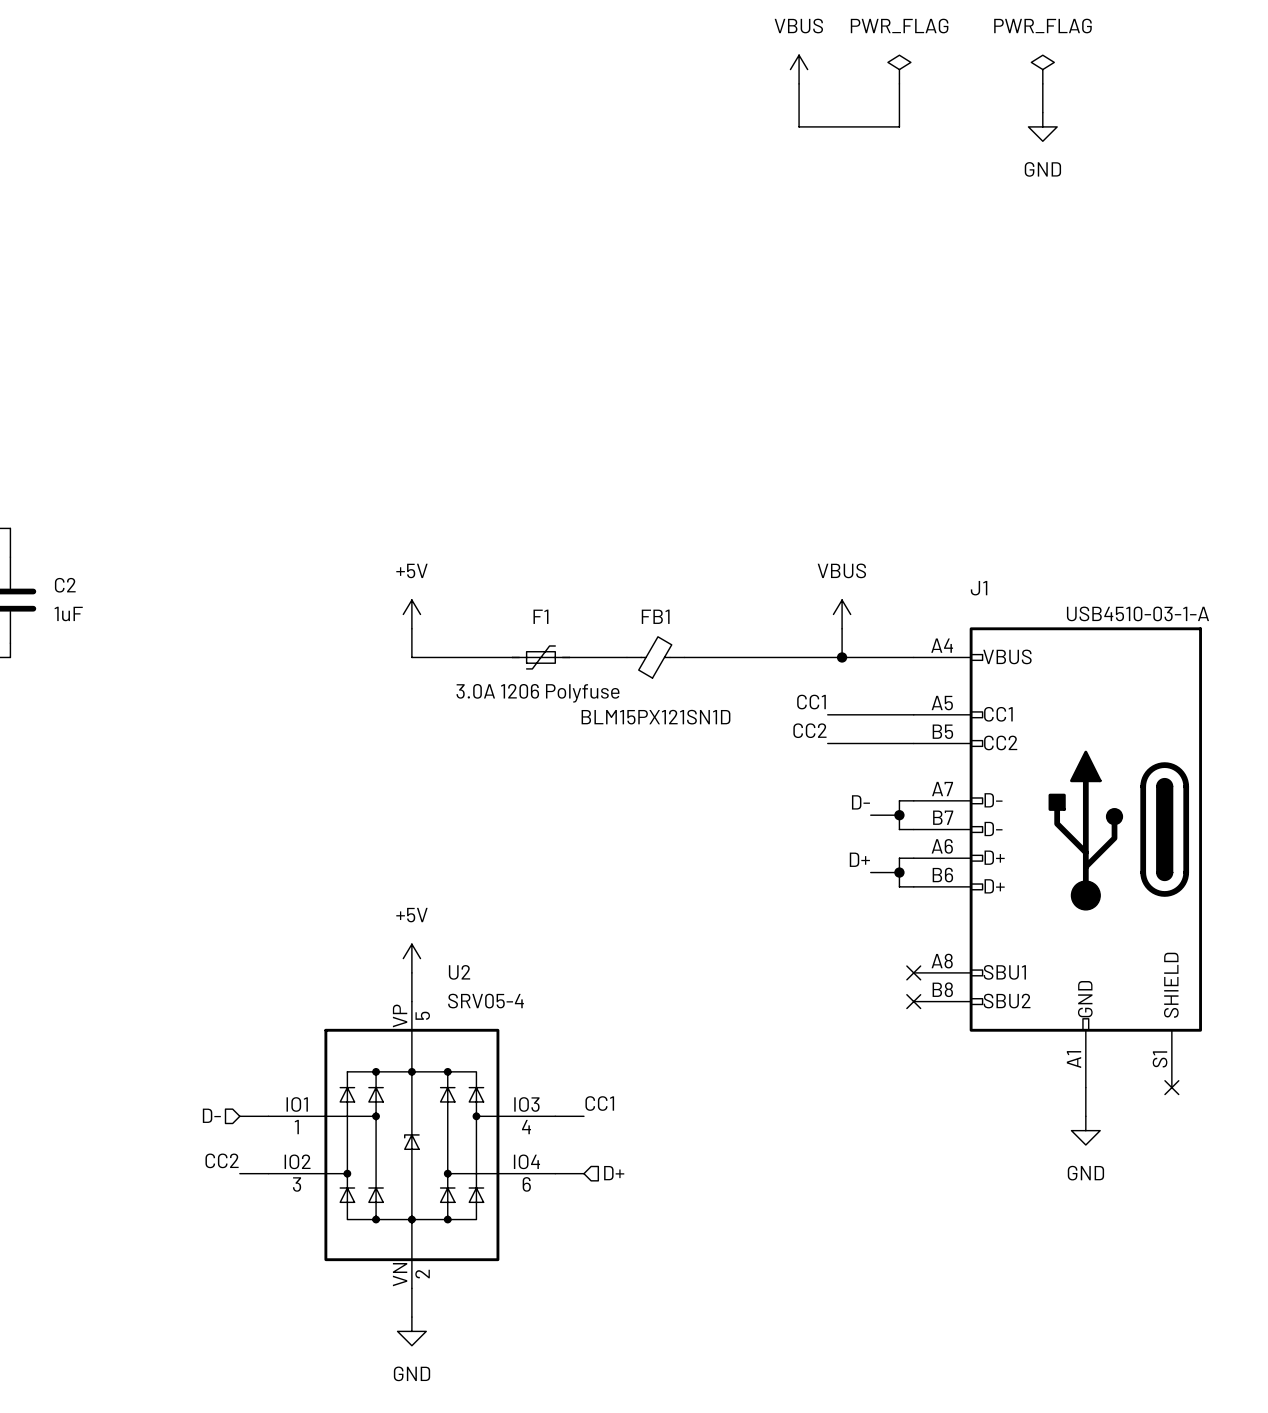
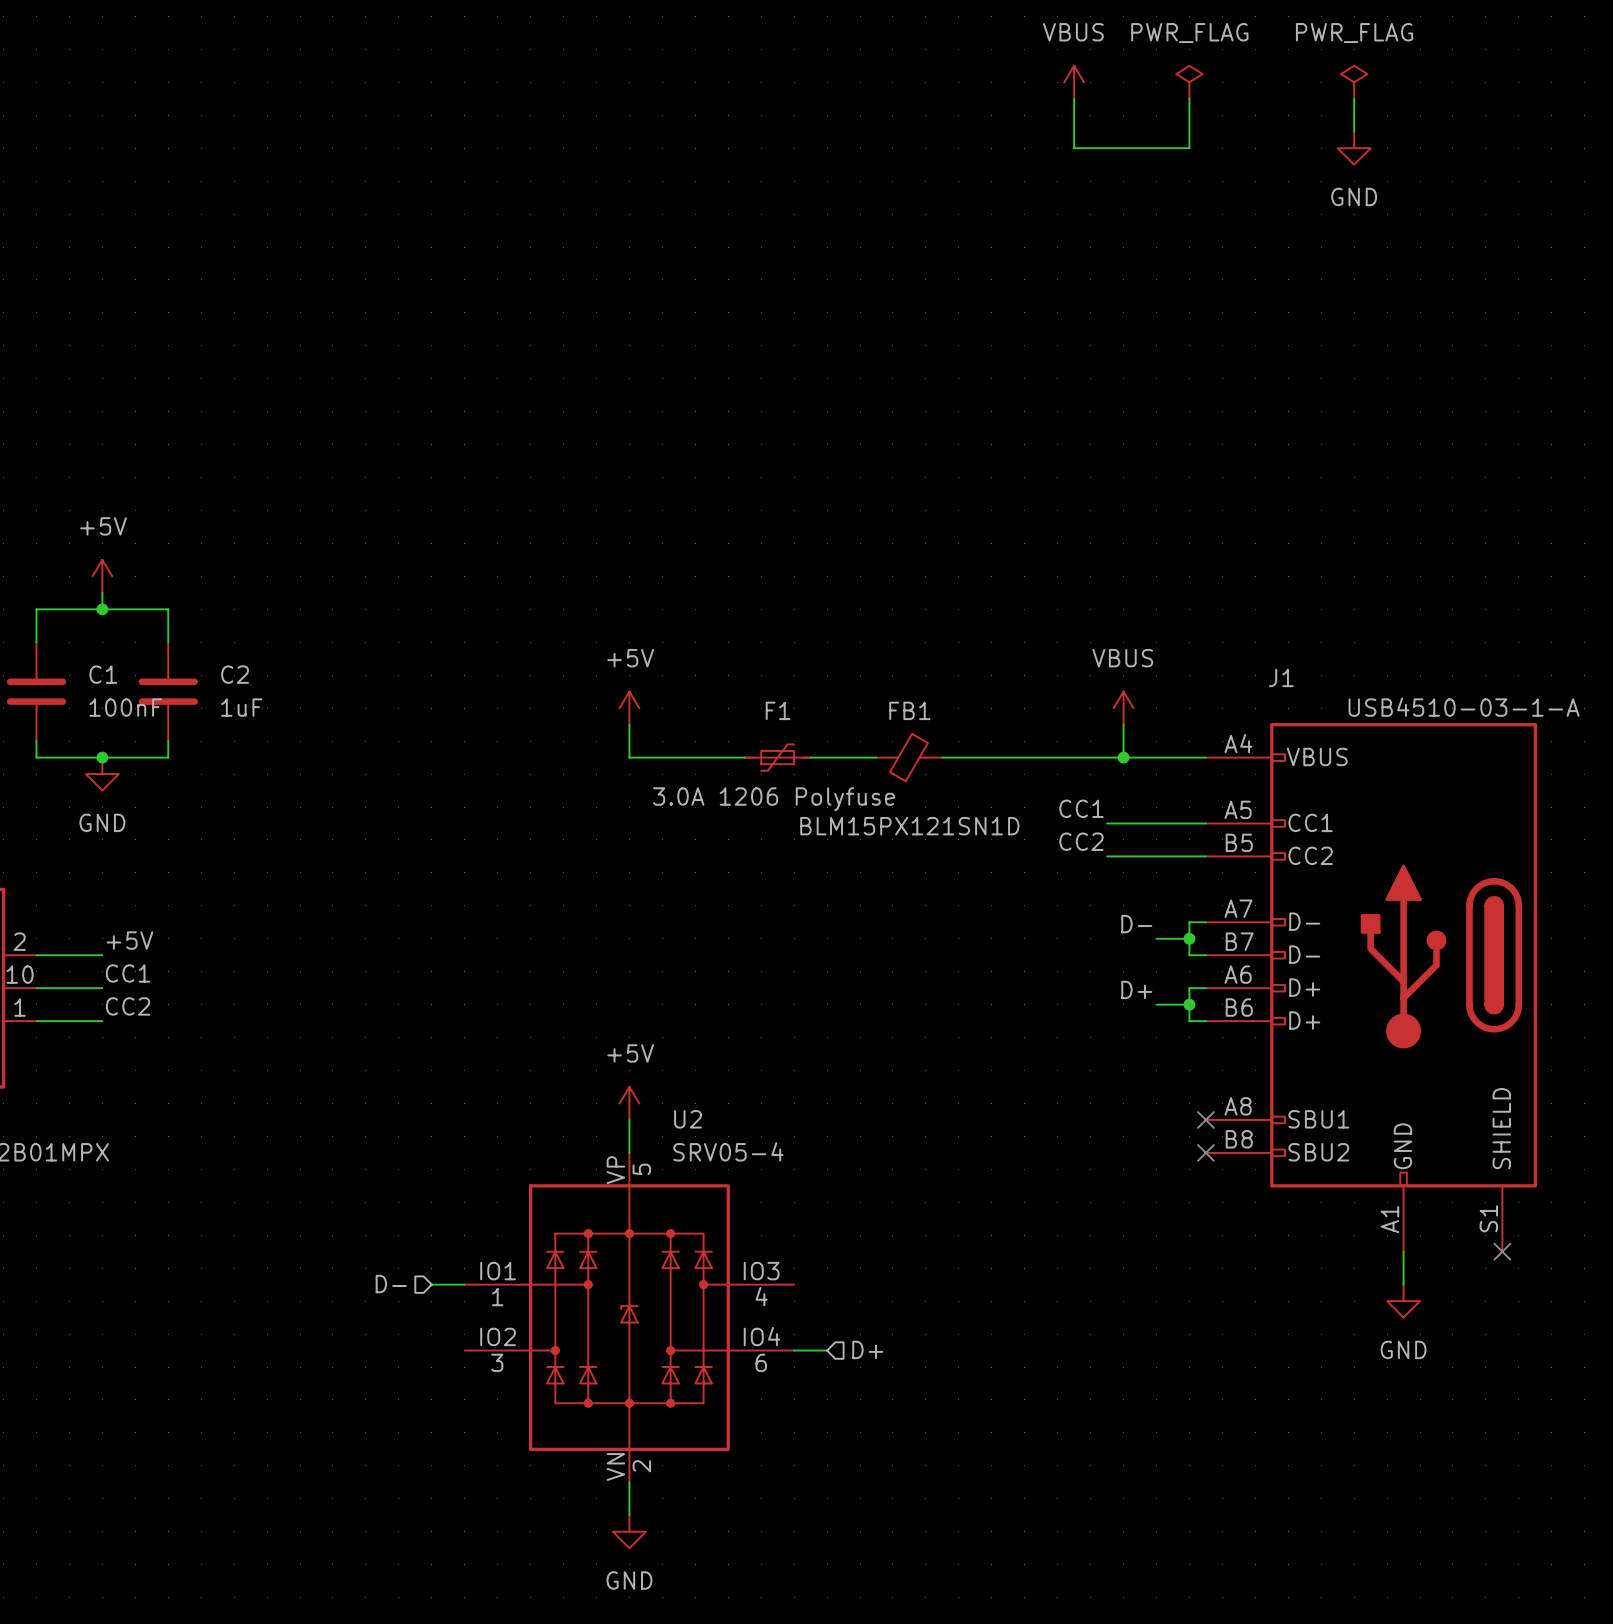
label: CC1 (599, 1103) -> none
wire: (555, 1116) (583, 1116) -> none
label: CC2 (222, 1160) -> none
wire: (239, 1173) (268, 1173) -> none

